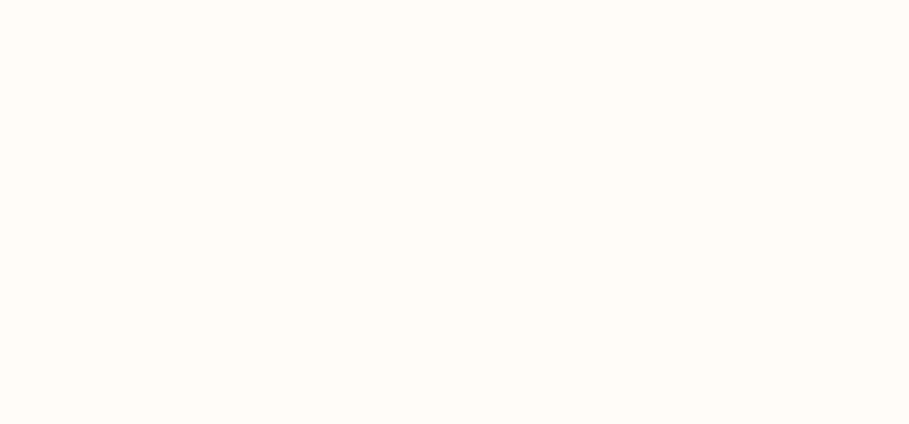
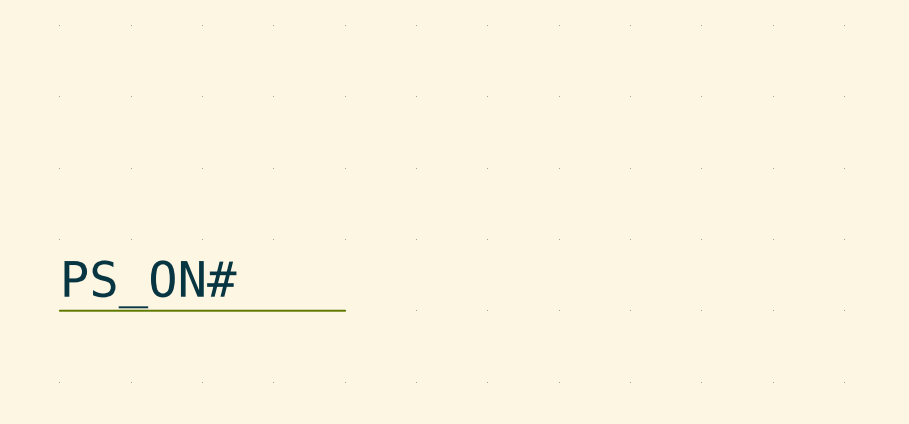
label: none -> PS_ON# (150, 284)
wire: none -> (59, 310) (345, 310)

